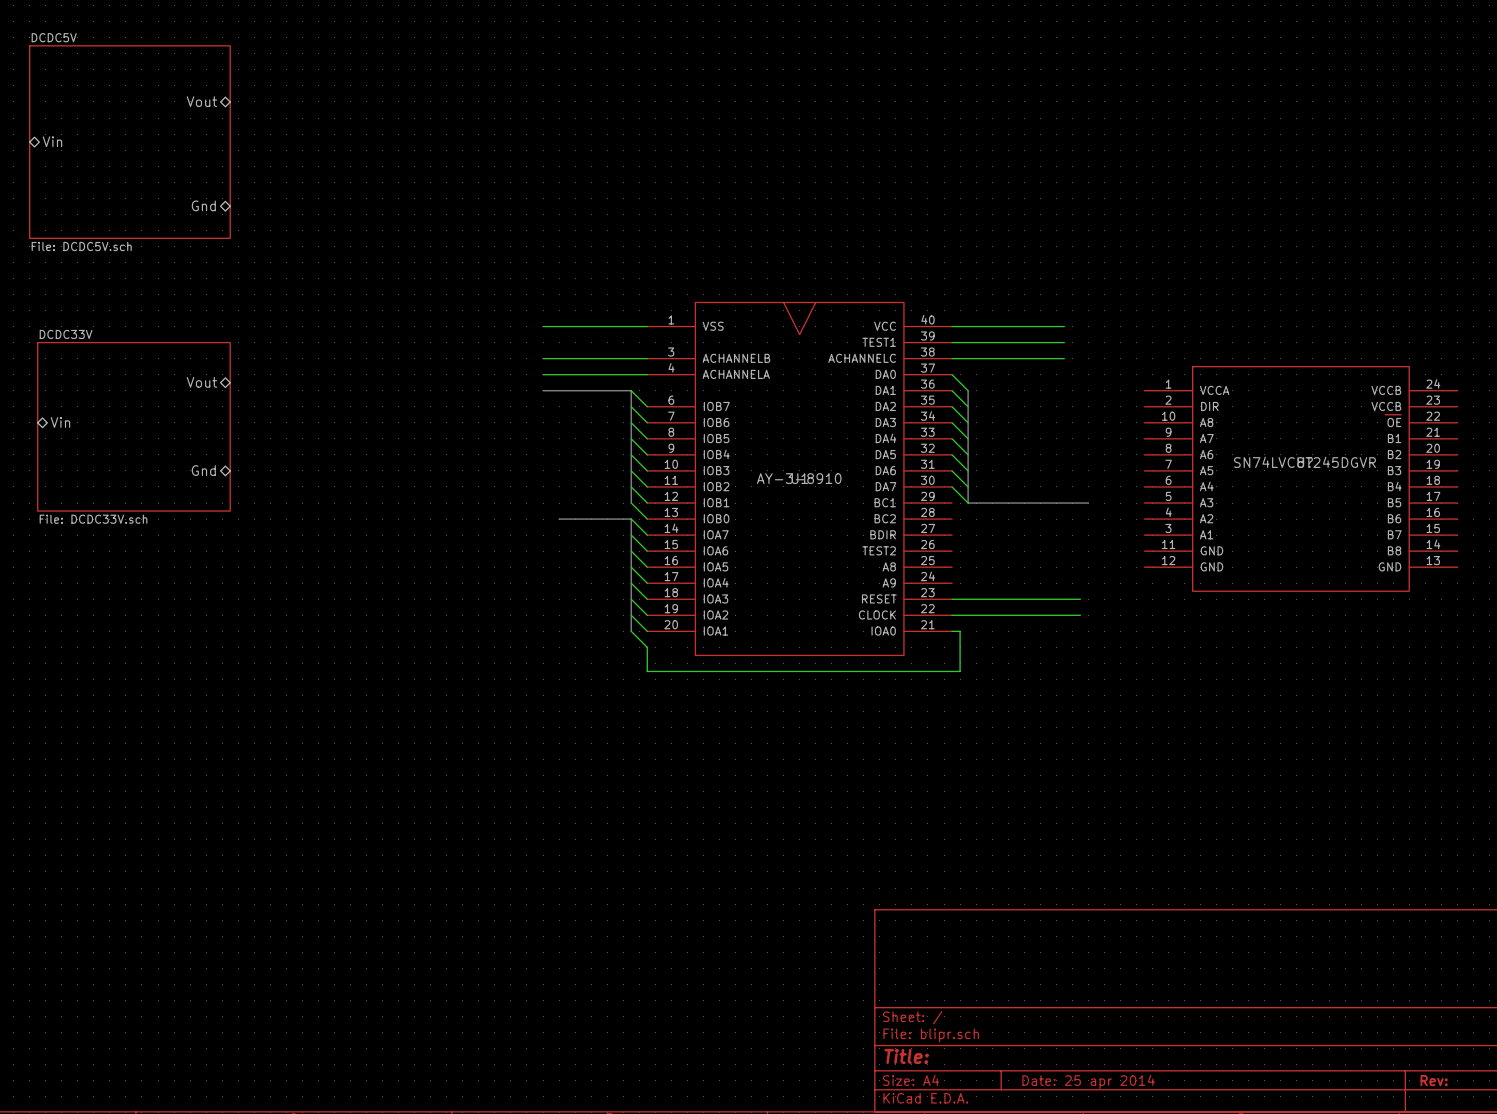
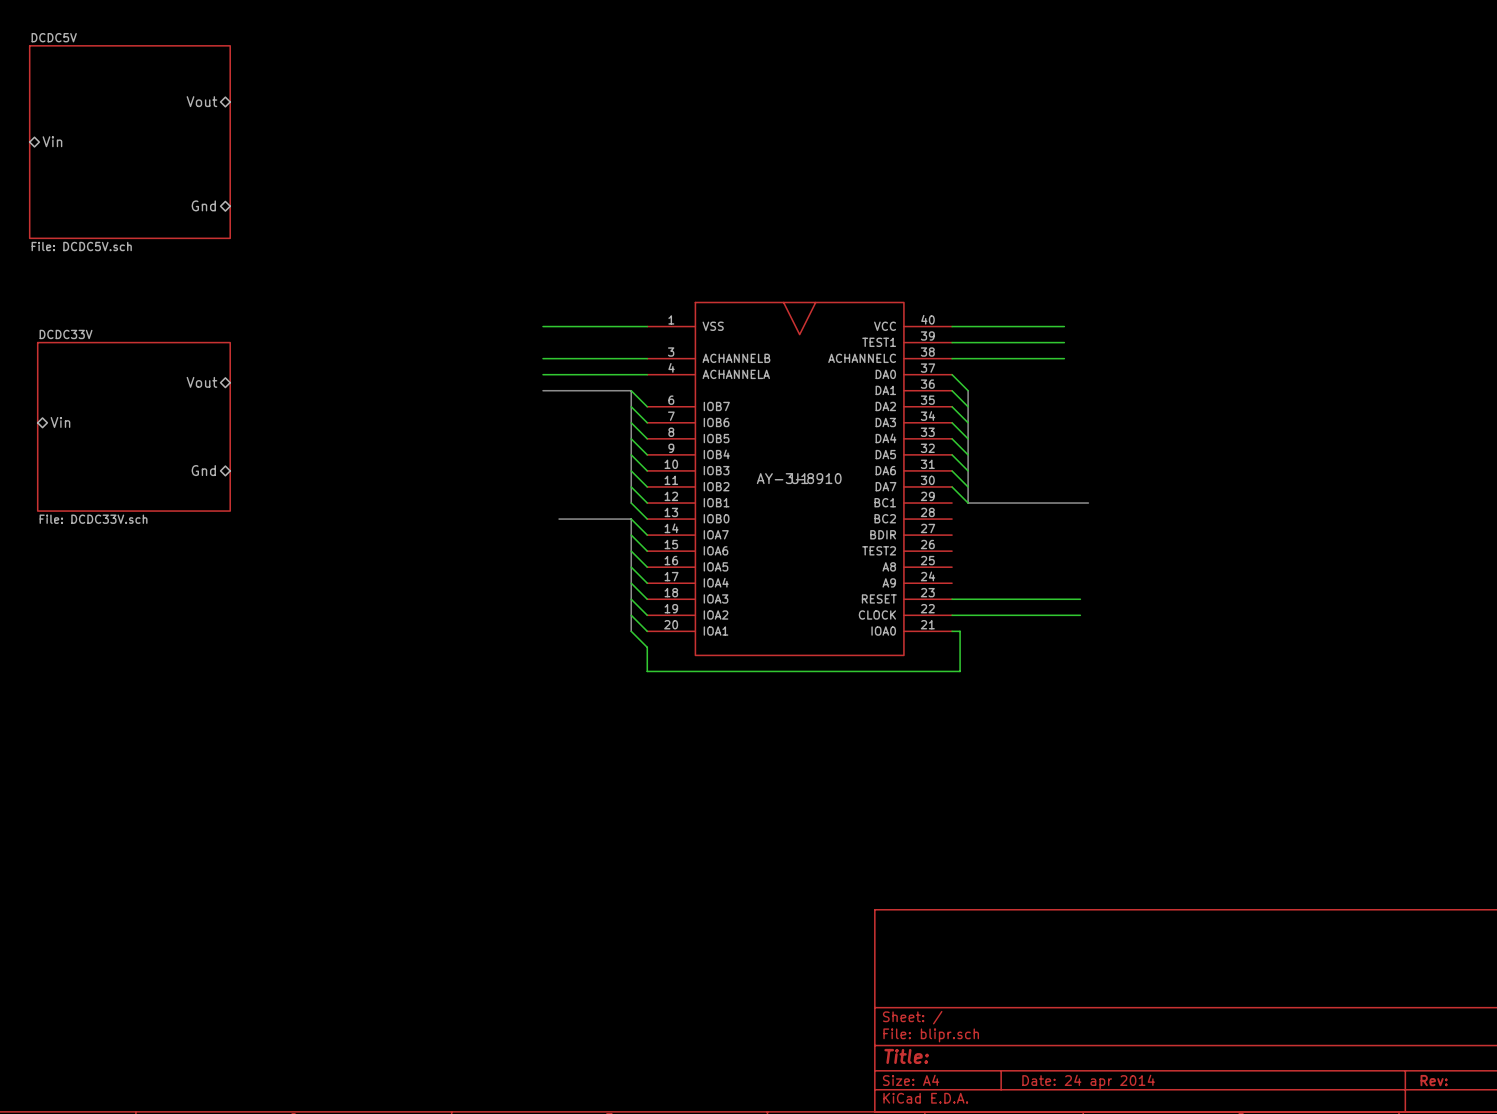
part: SN74LVC8T245DGVR (1300, 478) -> none
title block: Date: 25 apr 2014 (1088, 1081) -> Date: 24 apr 2014 (1088, 1081)

